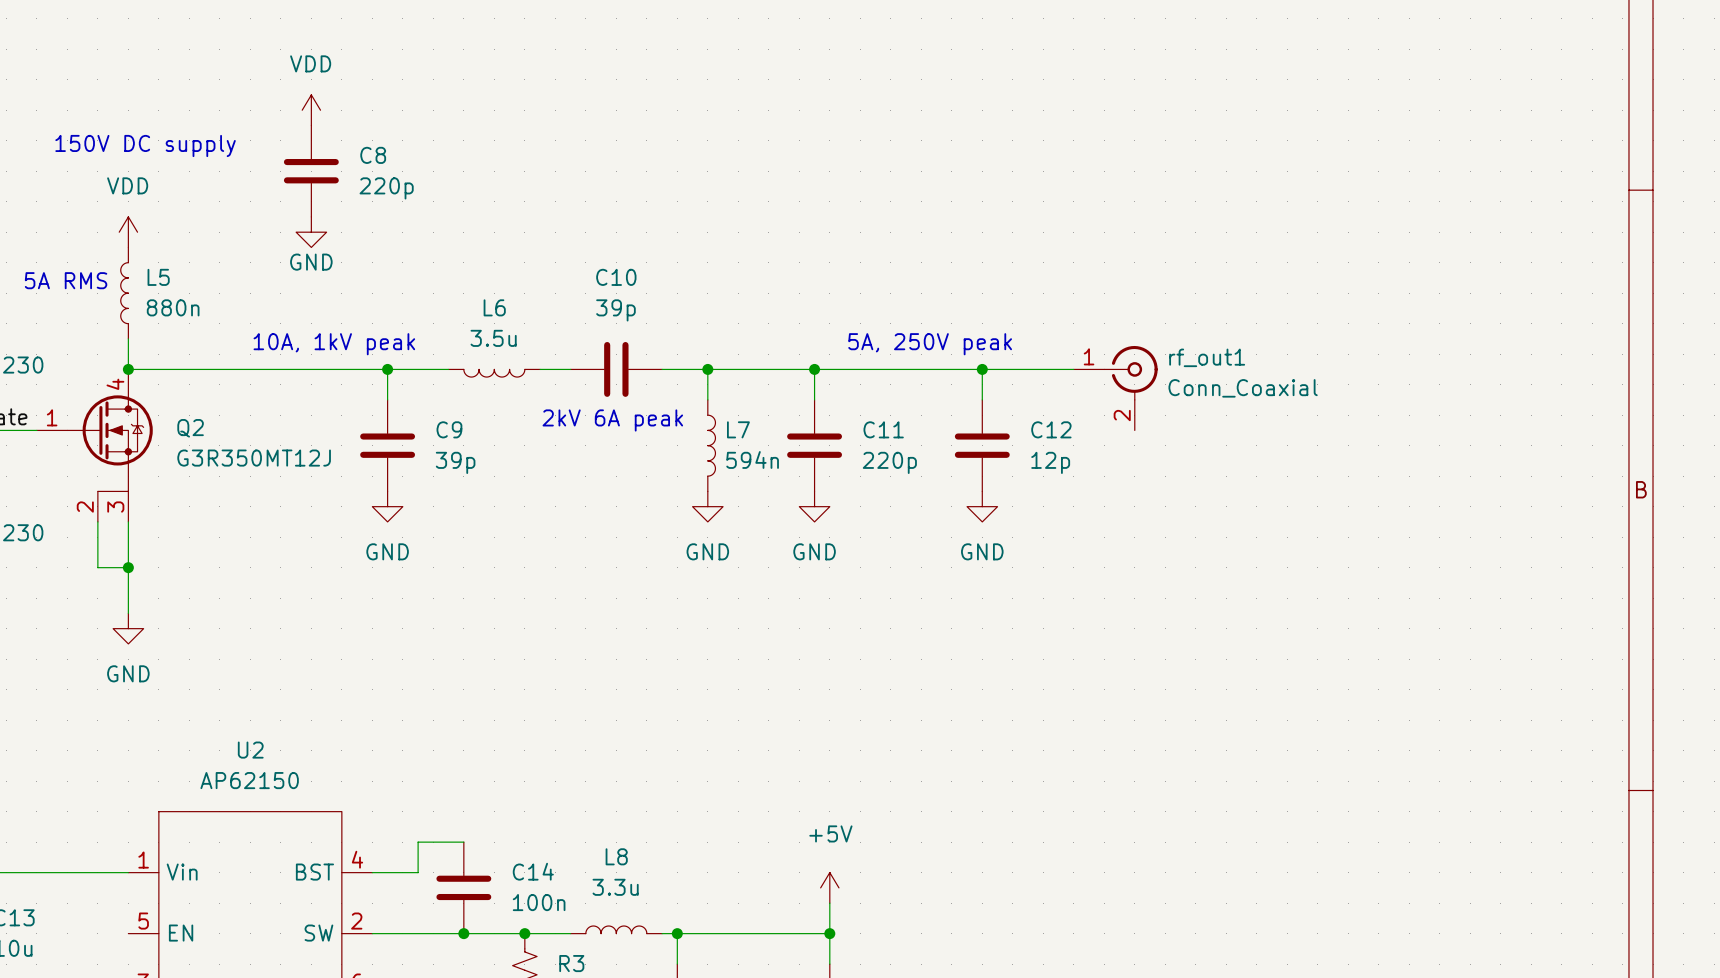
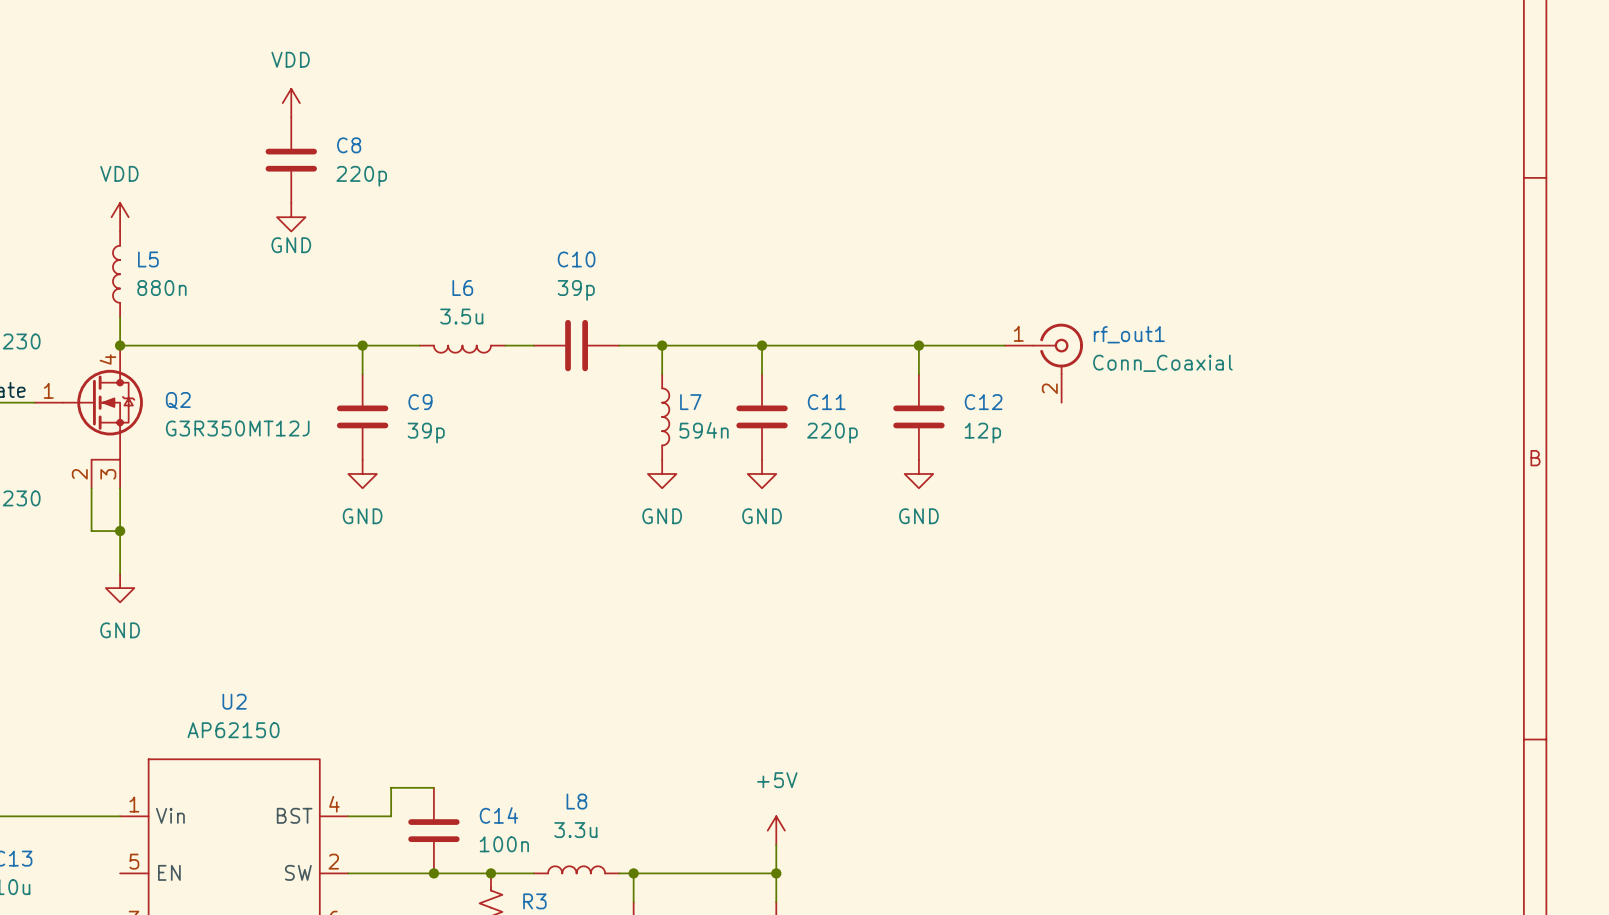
text: 150V DC supply (145, 145) -> none
text: 5A RMS (66, 280) -> none
text: 10A, 1kV peak (334, 344) -> none
text: 5A, 250V peak (930, 344) -> none
text: 2kV 6A peak (612, 420) -> none

